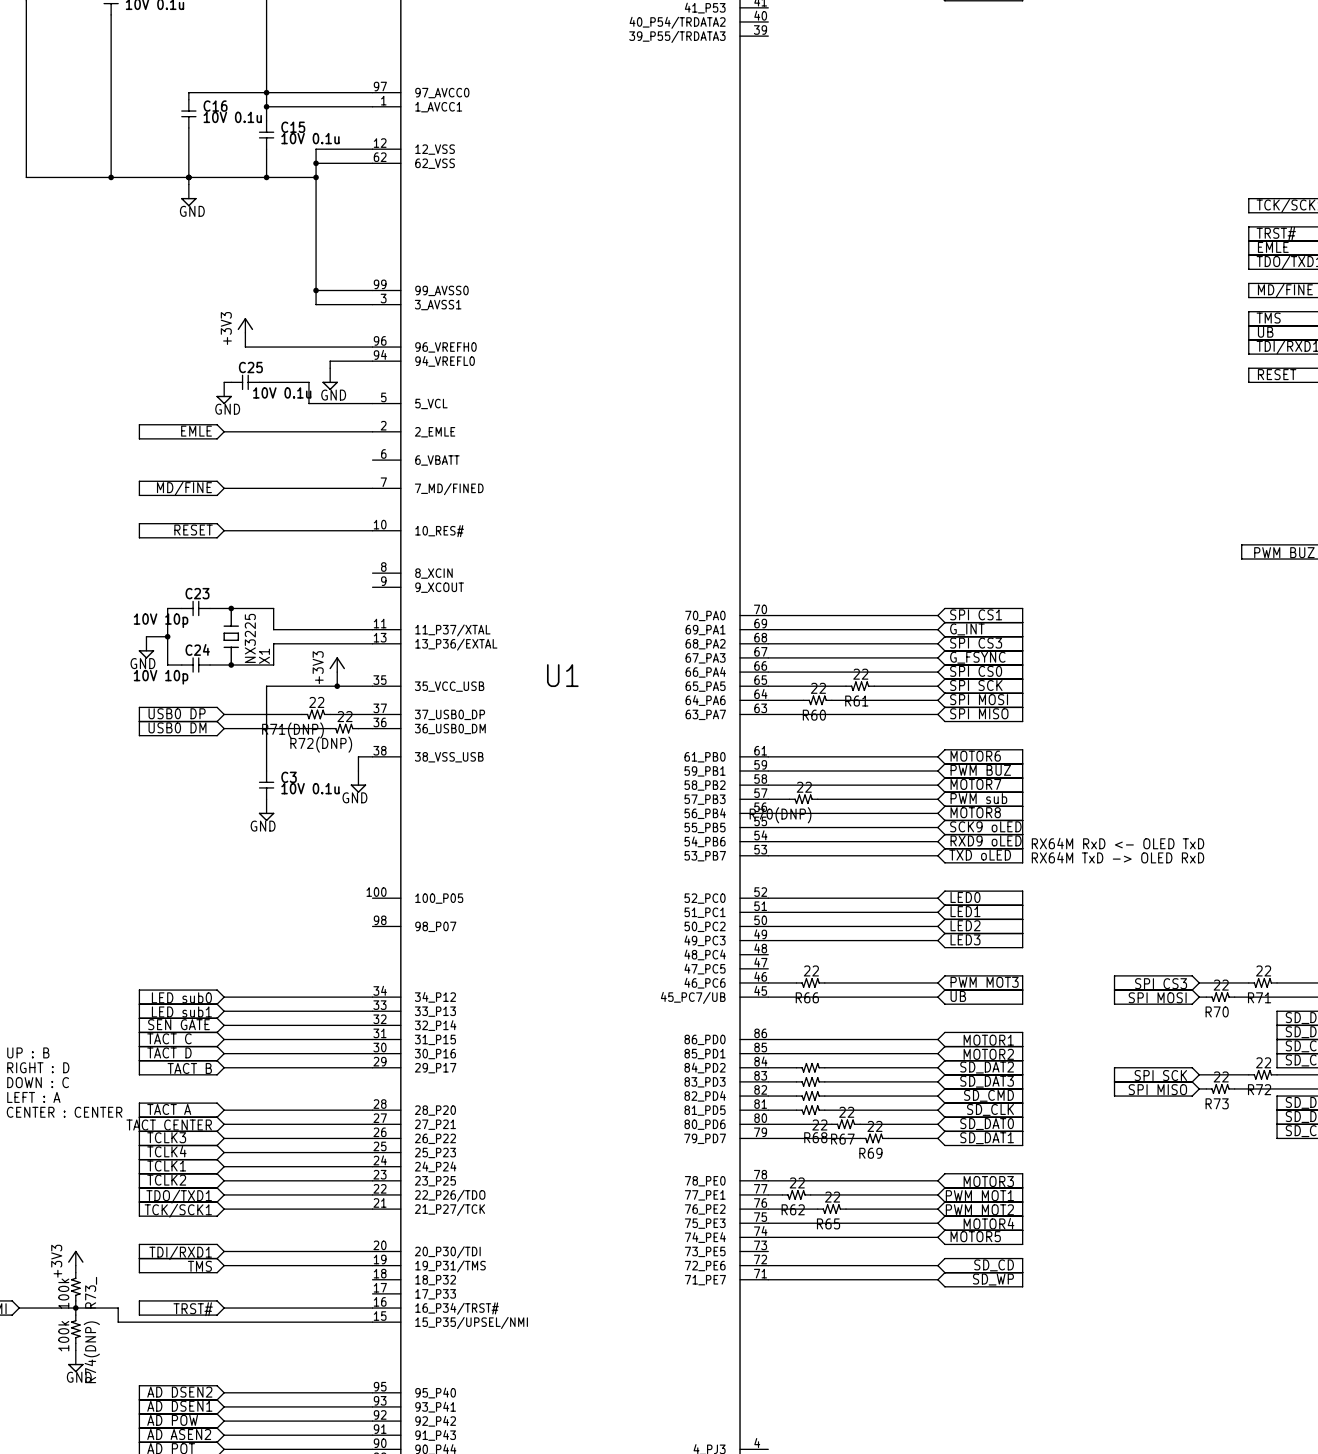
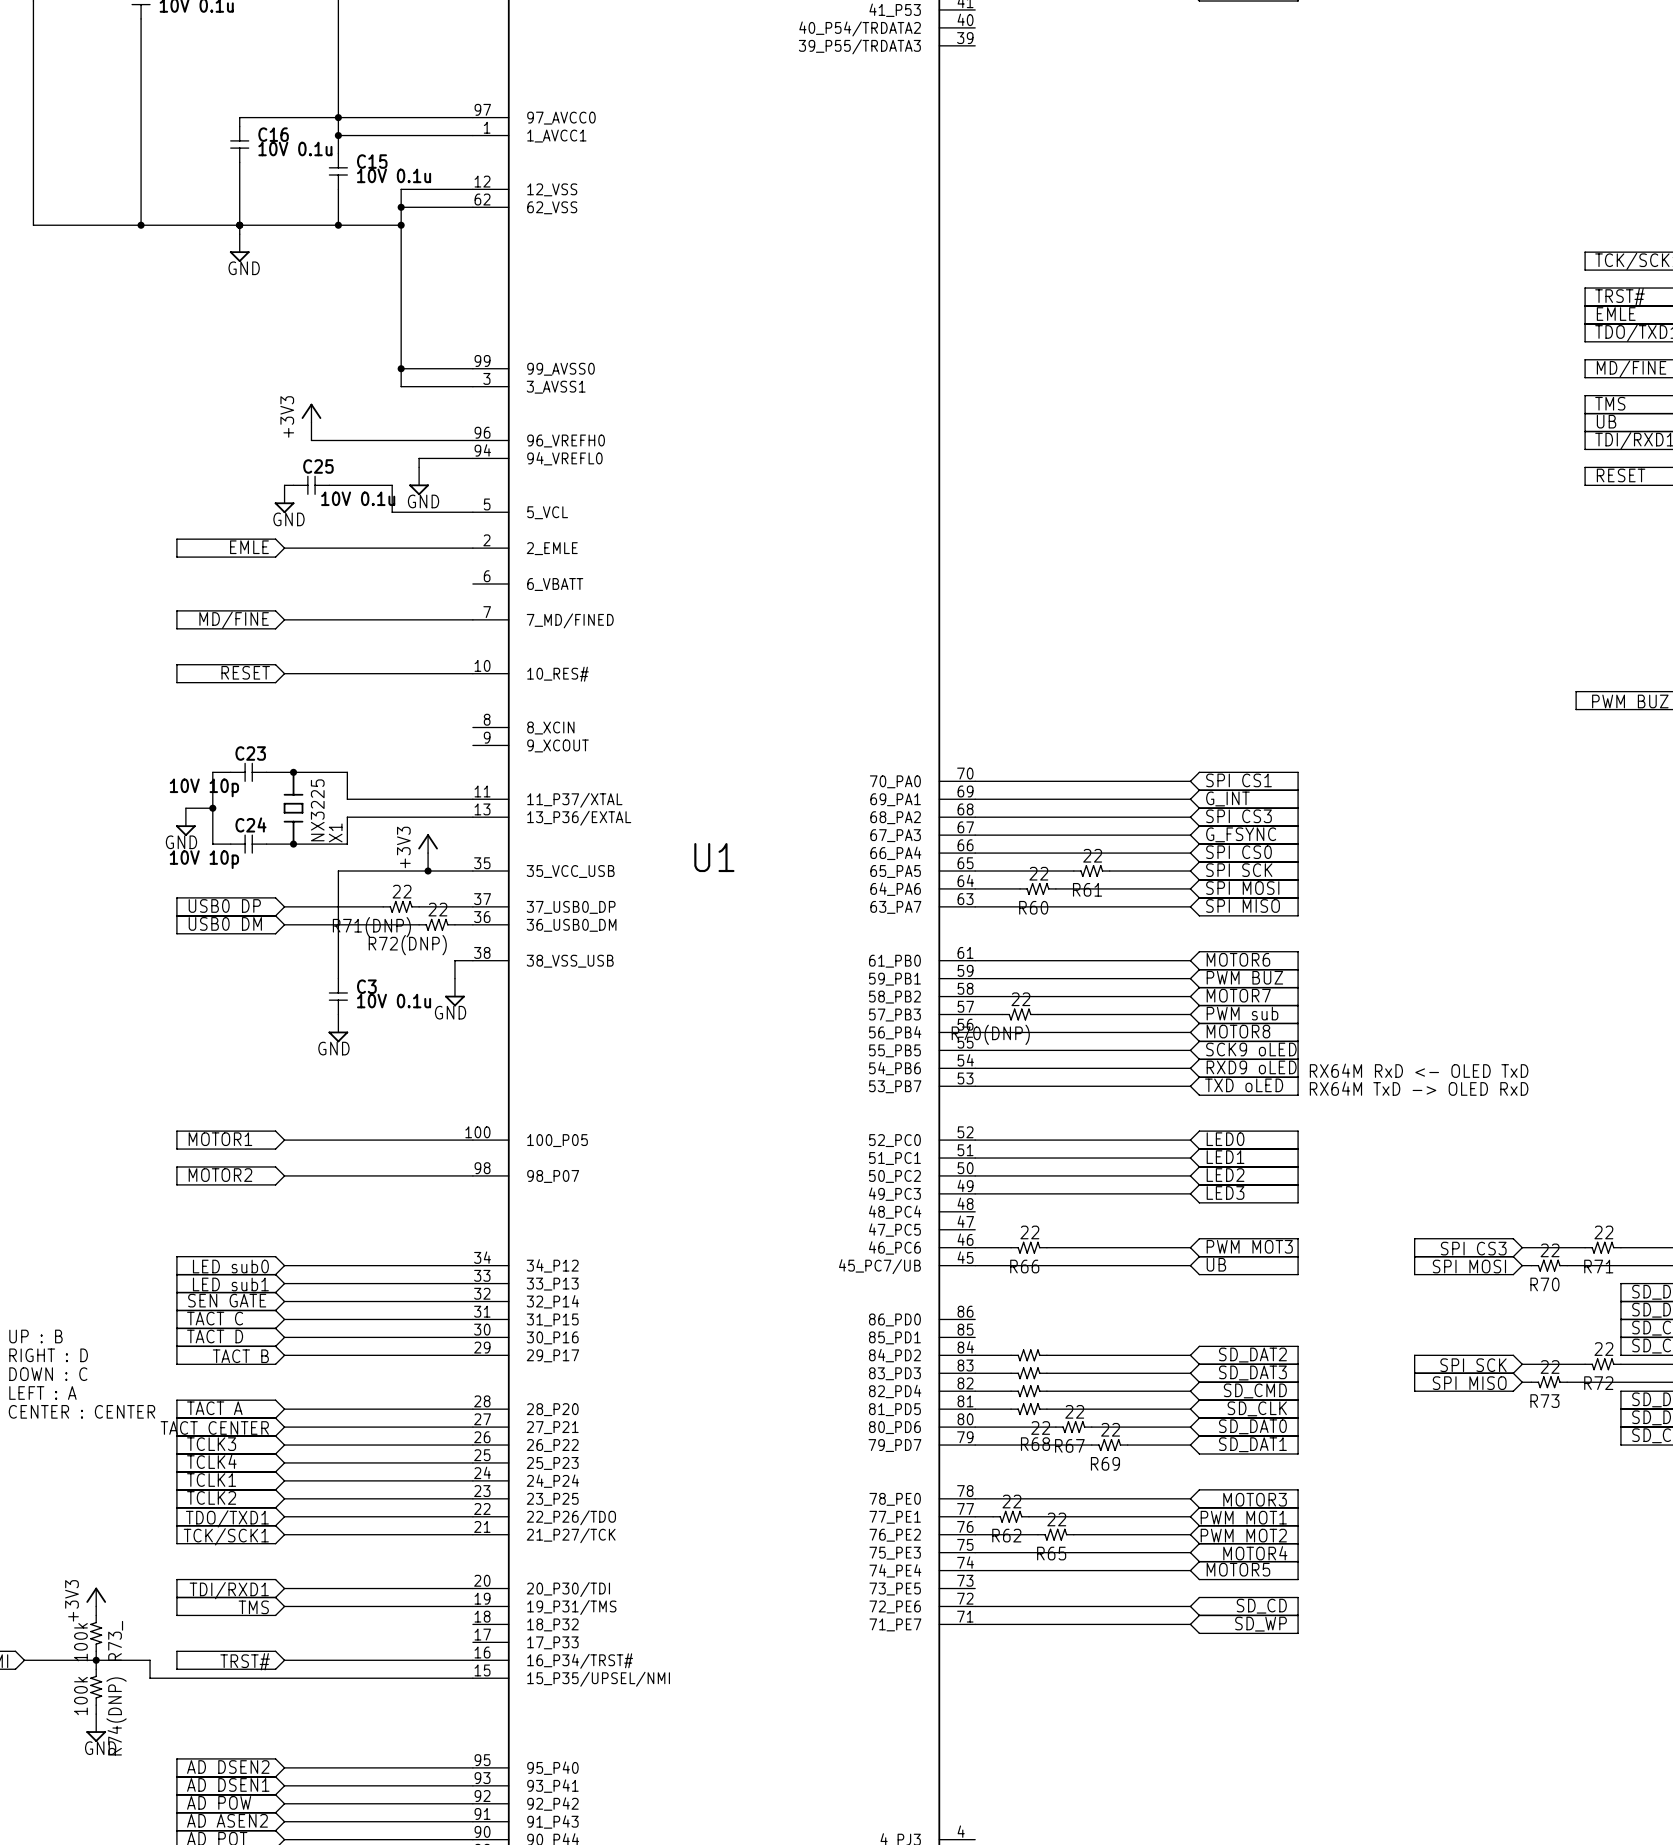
power symbol: none -> MOTOR1 (230, 1140)
wire: none -> (284, 1140) (472, 1140)
power symbol: none -> MOTOR2 (230, 1175)
wire: none -> (284, 1175) (472, 1175)
wire: (768, 1039) (937, 1039) -> none
power symbol: MOTOR1 (980, 1039) -> none
wire: (768, 1053) (937, 1053) -> none
power symbol: MOTOR2 (980, 1053) -> none

